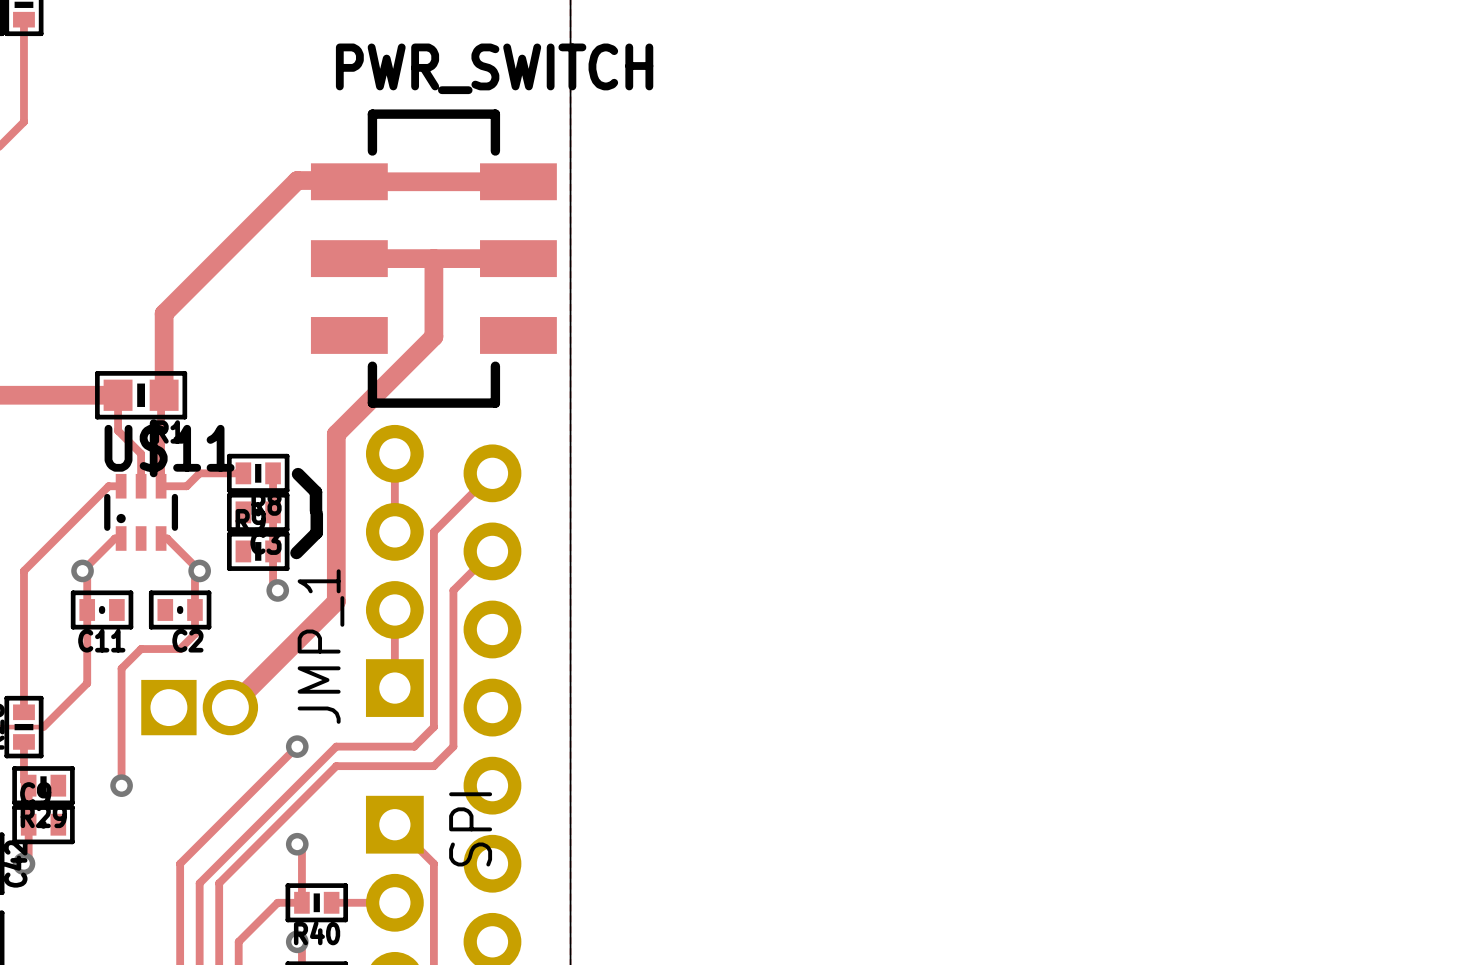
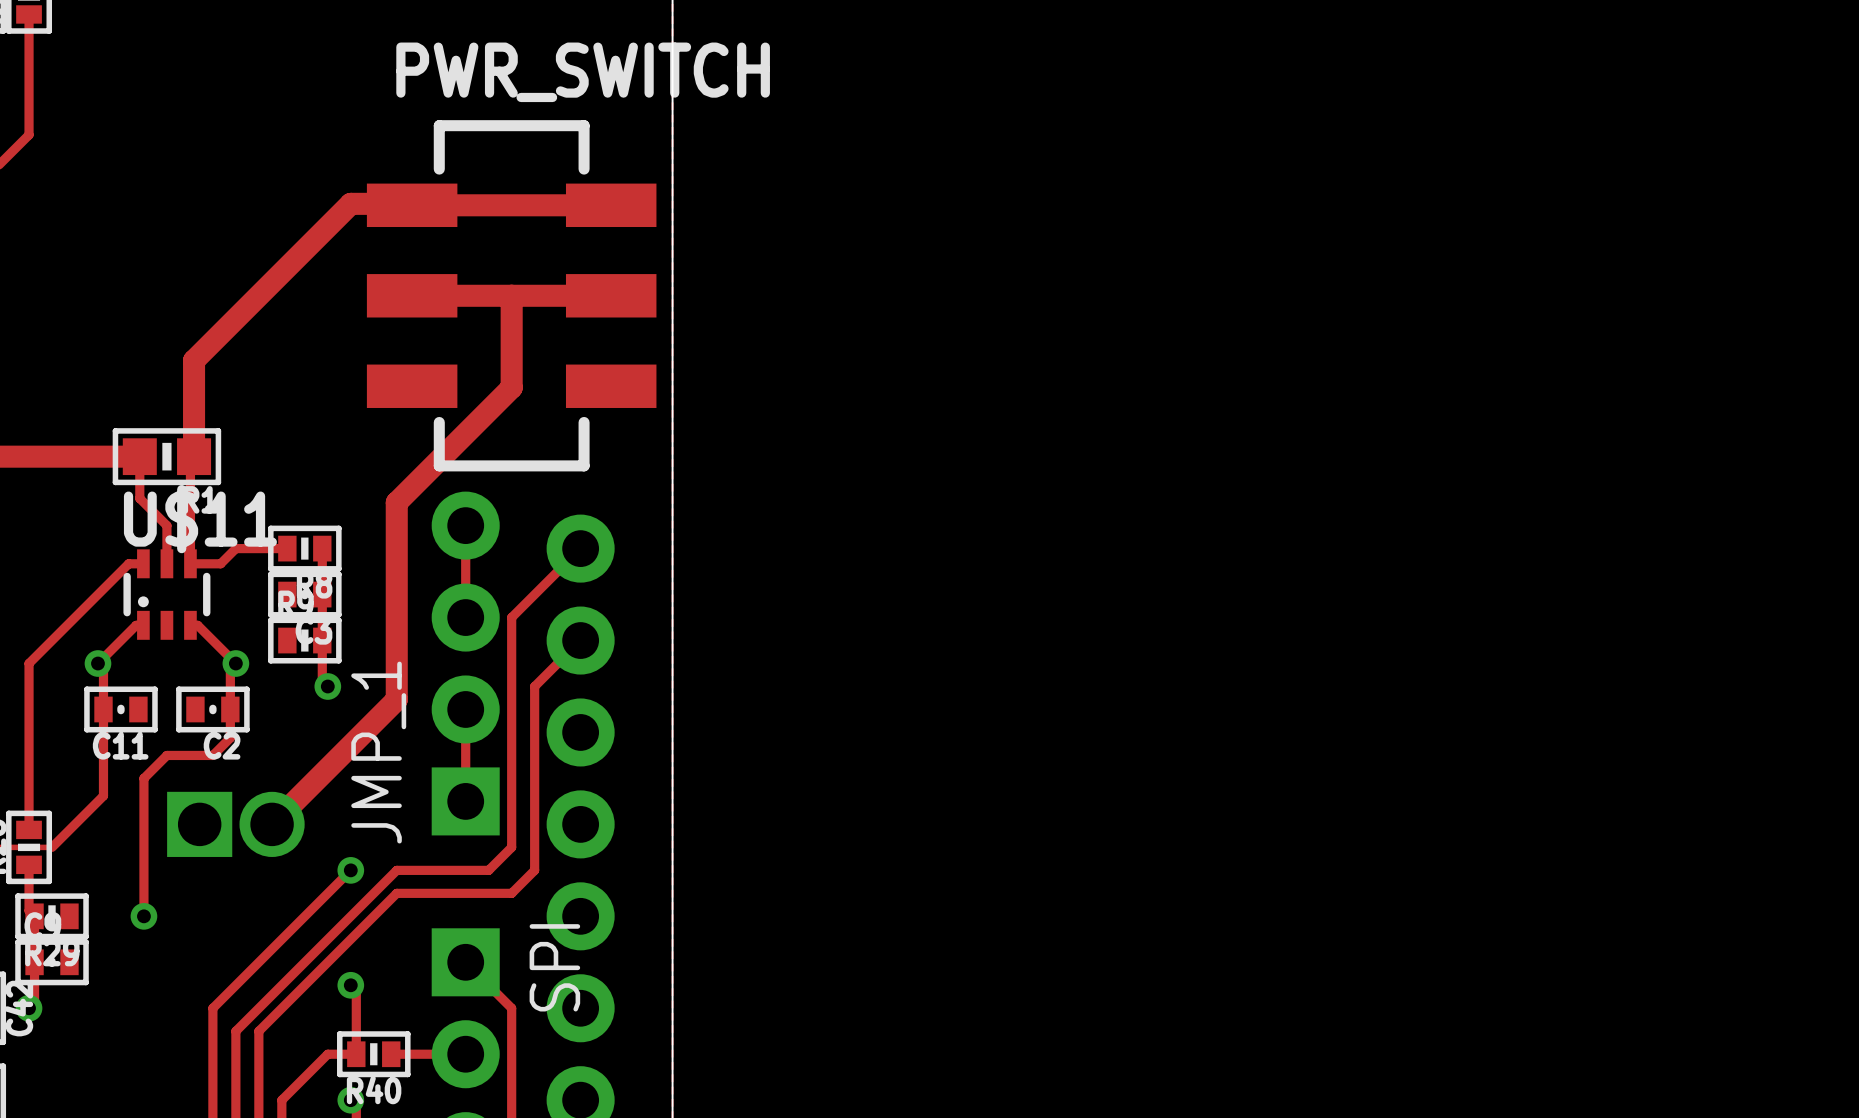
line: (298, 474) (316, 492) (316, 510) -> none
line: (316, 513) (316, 532) (296, 552) -> none

